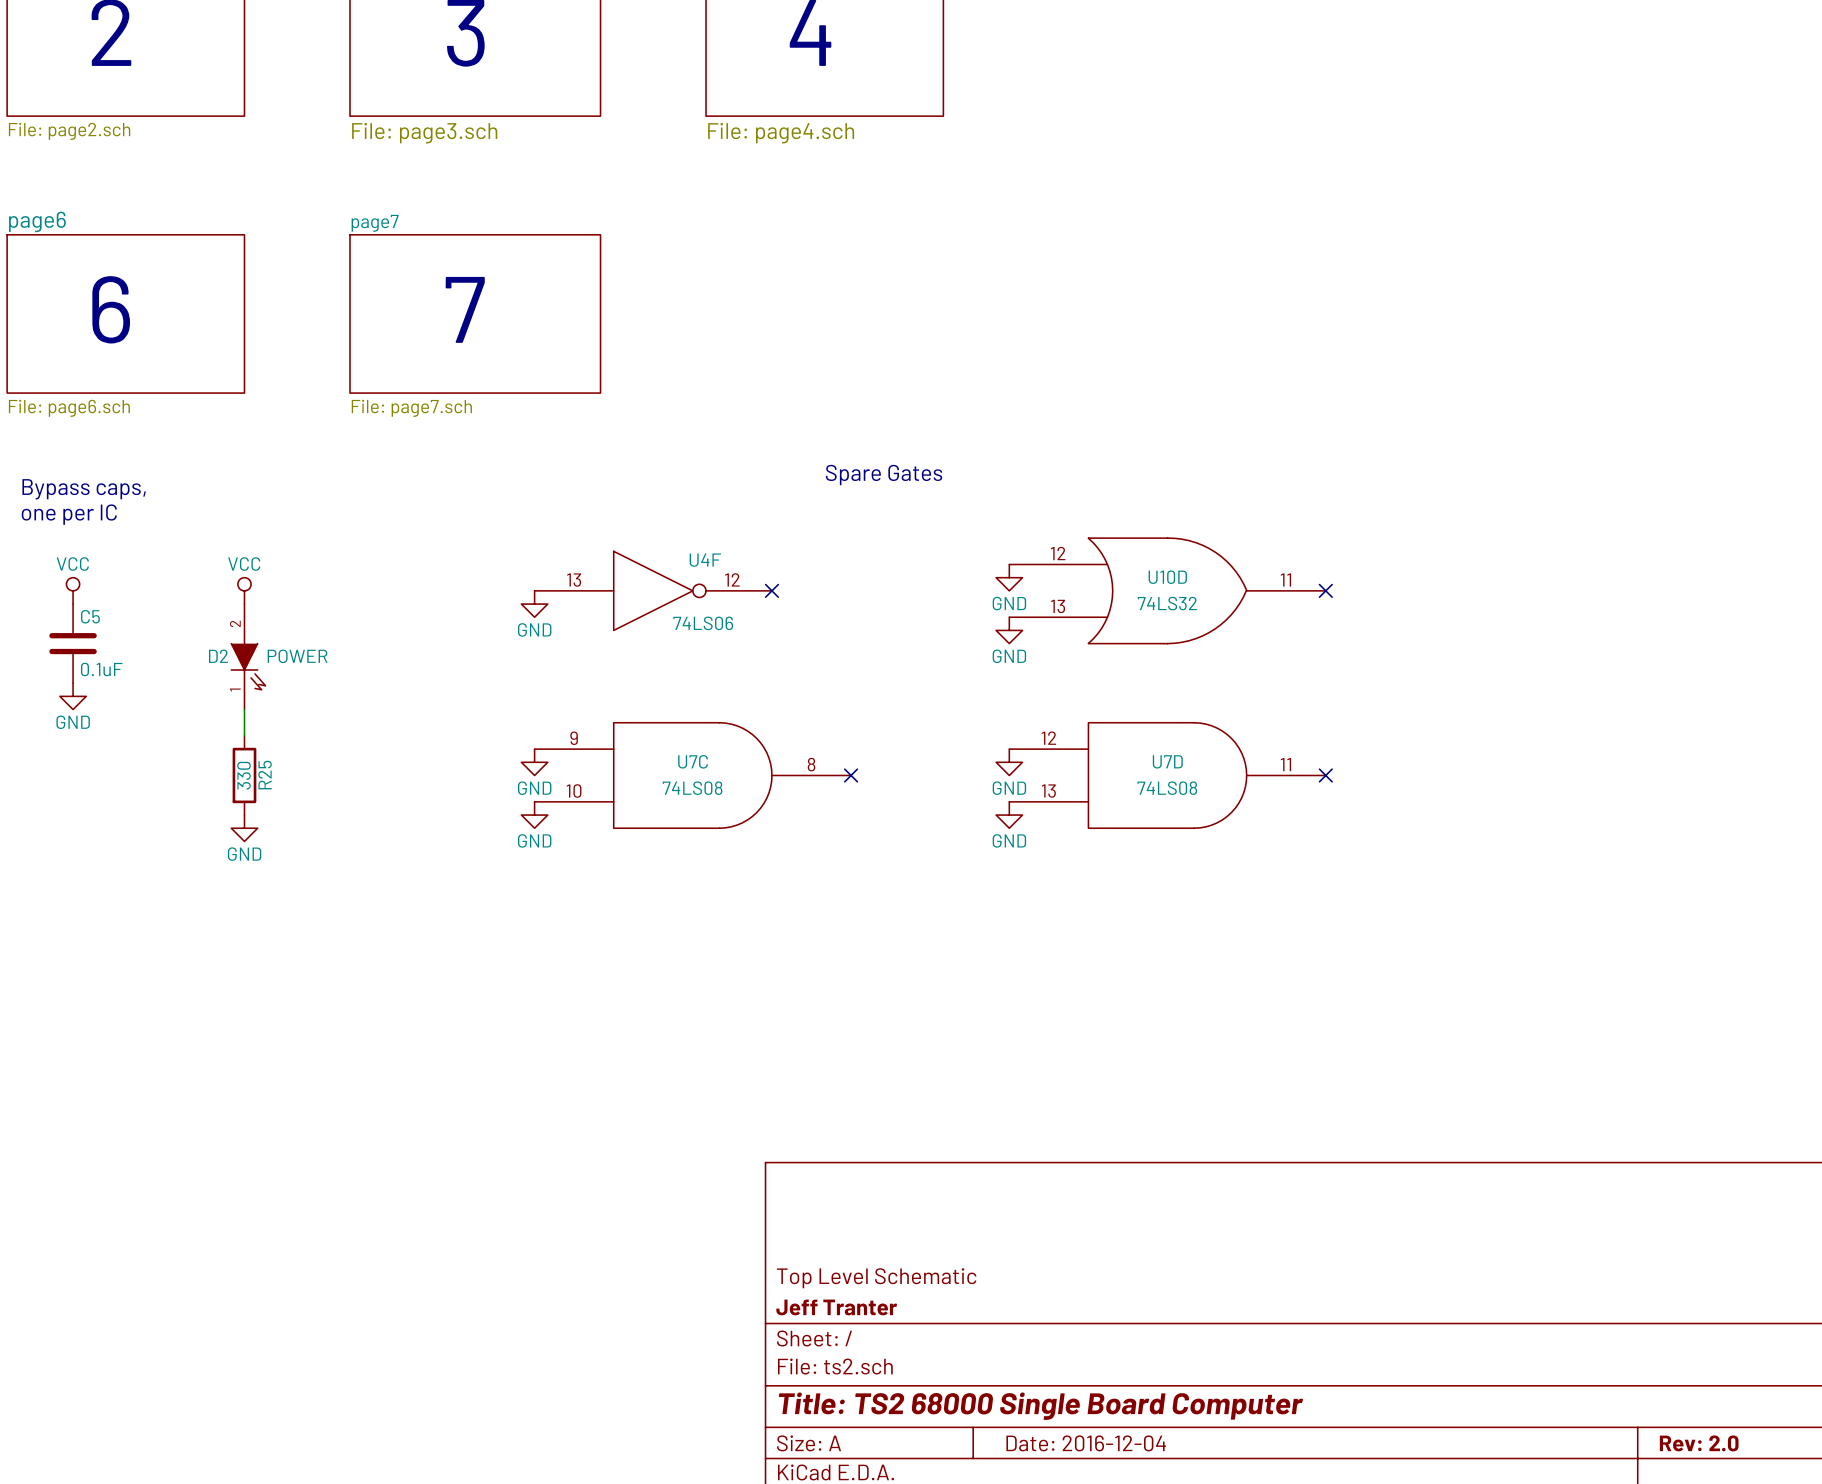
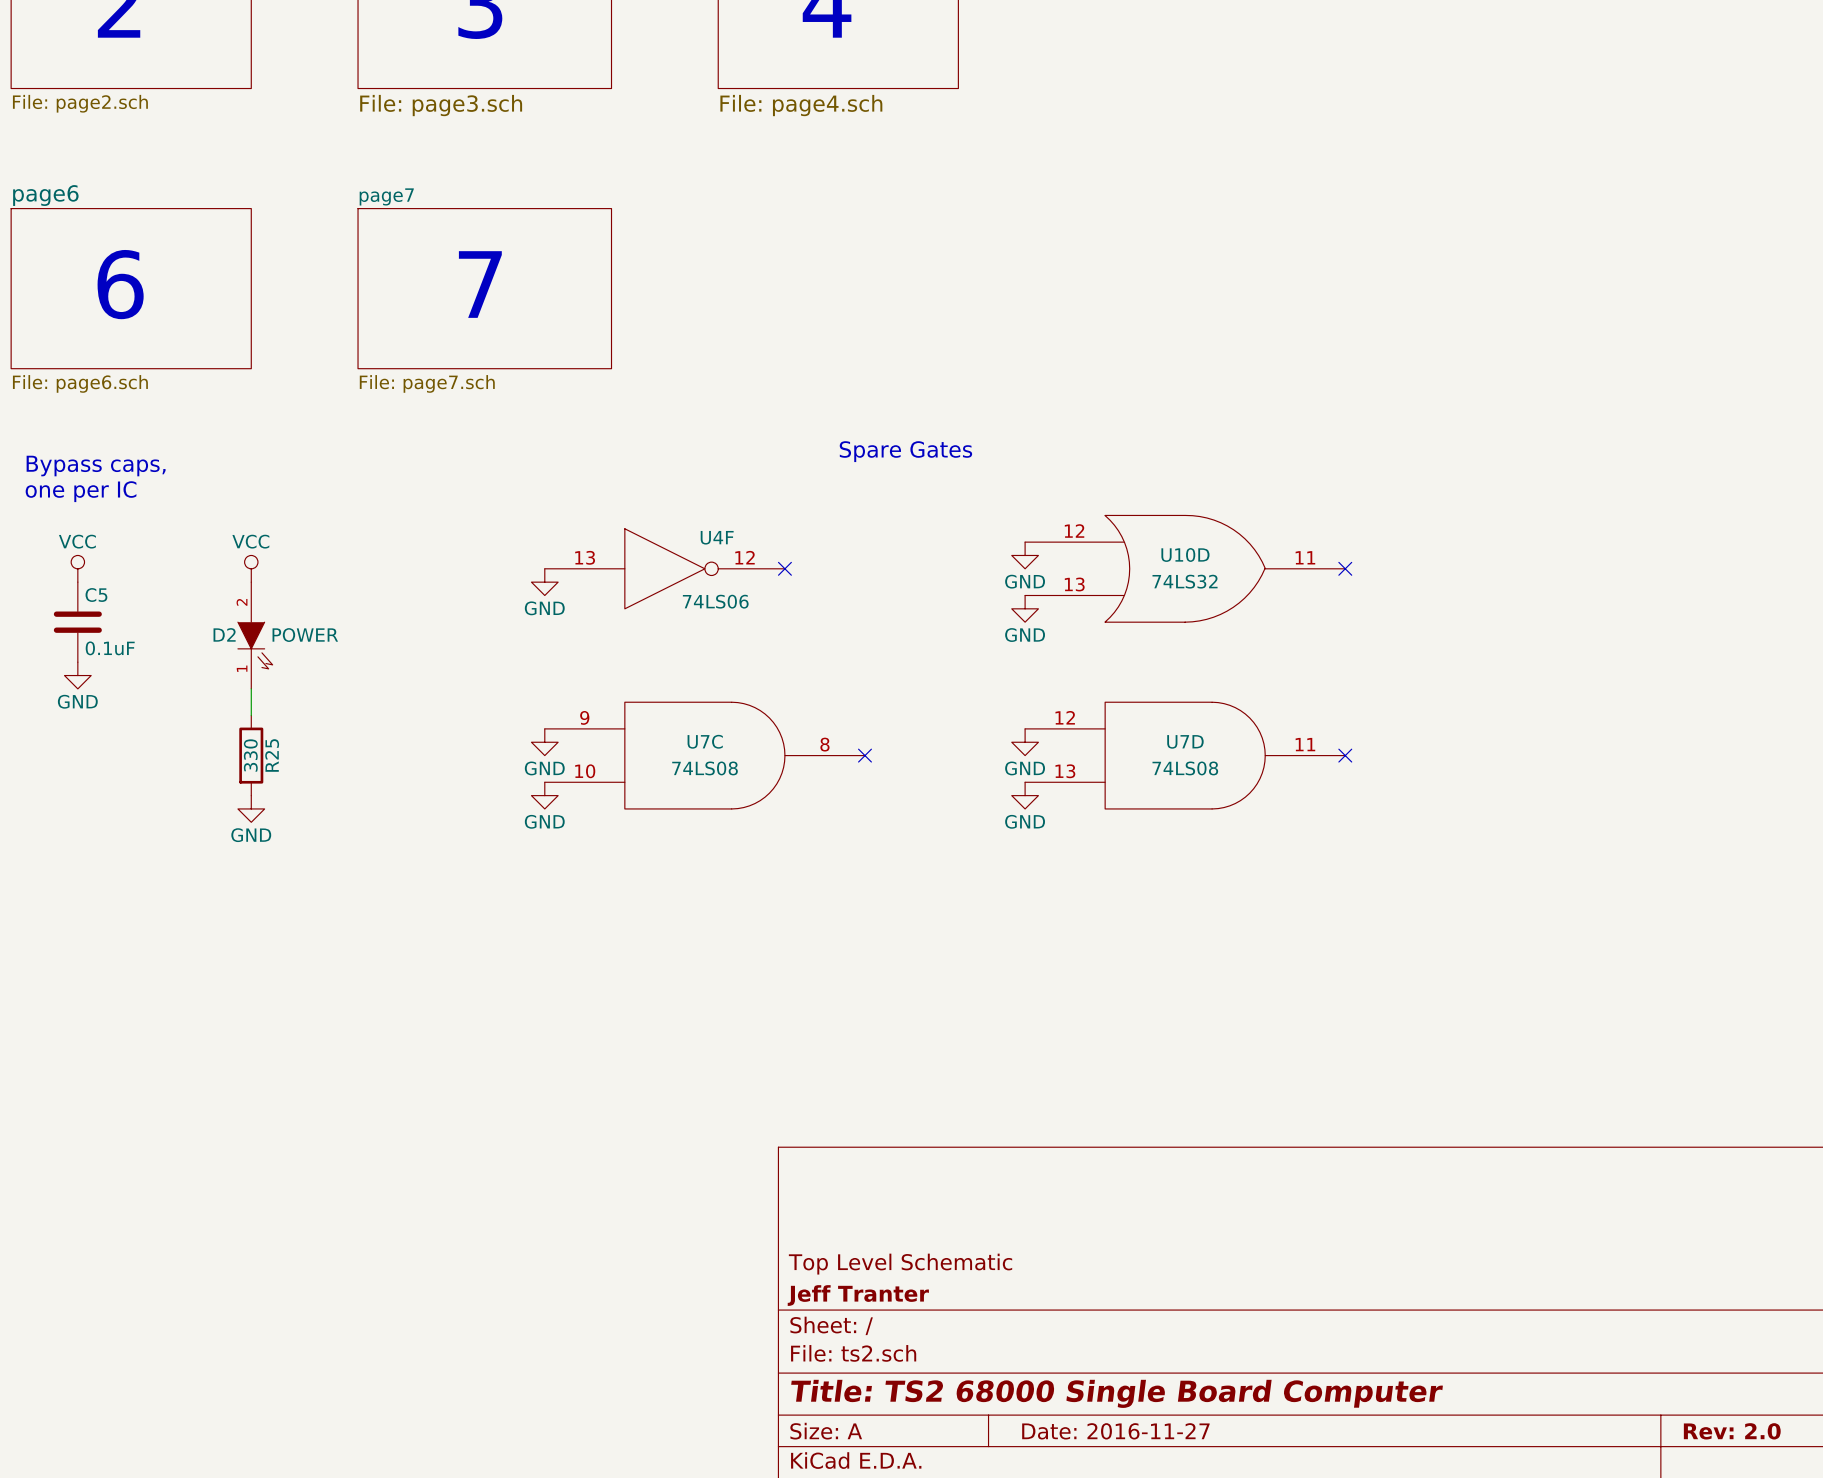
title block: Date: 2016-12-04 (1086, 1443) -> Date: 2016-11-27 (1115, 1431)

